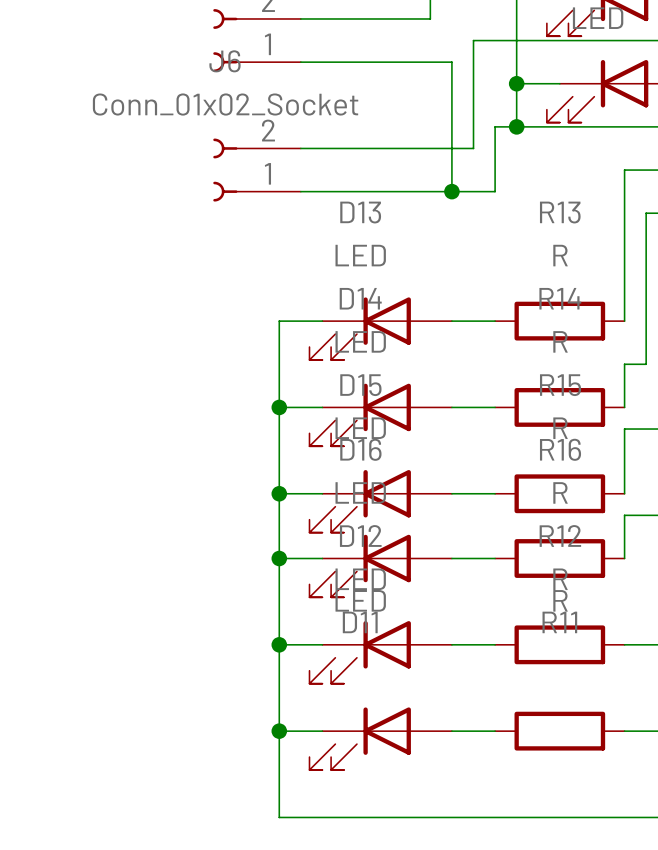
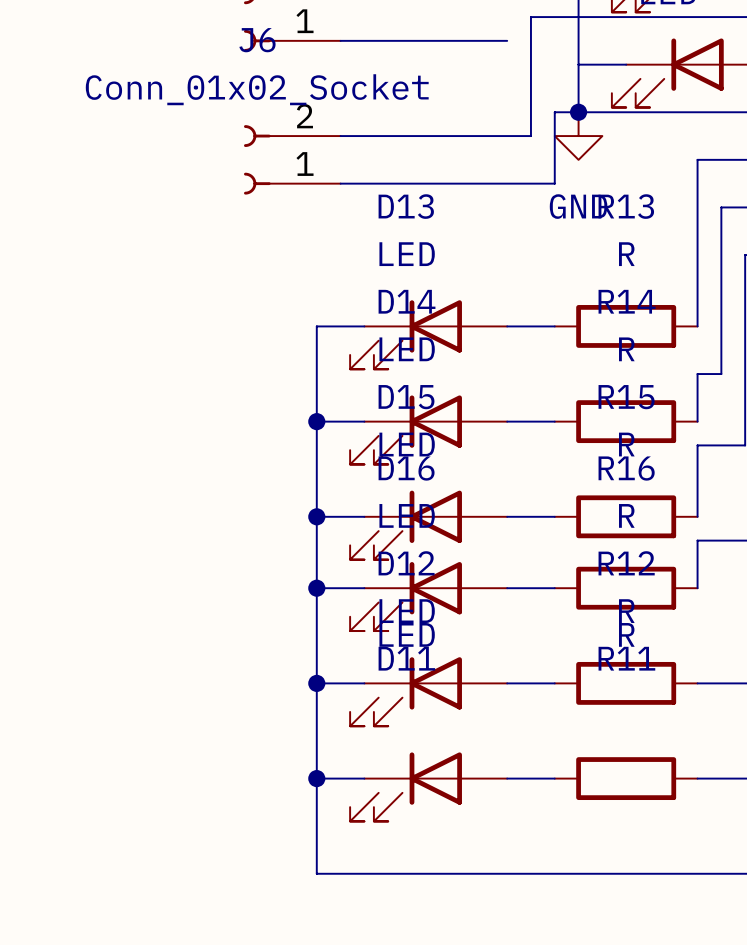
wire: (451, 62) (451, 191) -> none
junction: (516, 83) -> none
power symbol: none -> GND (578, 136)
junction: (451, 191) -> none

